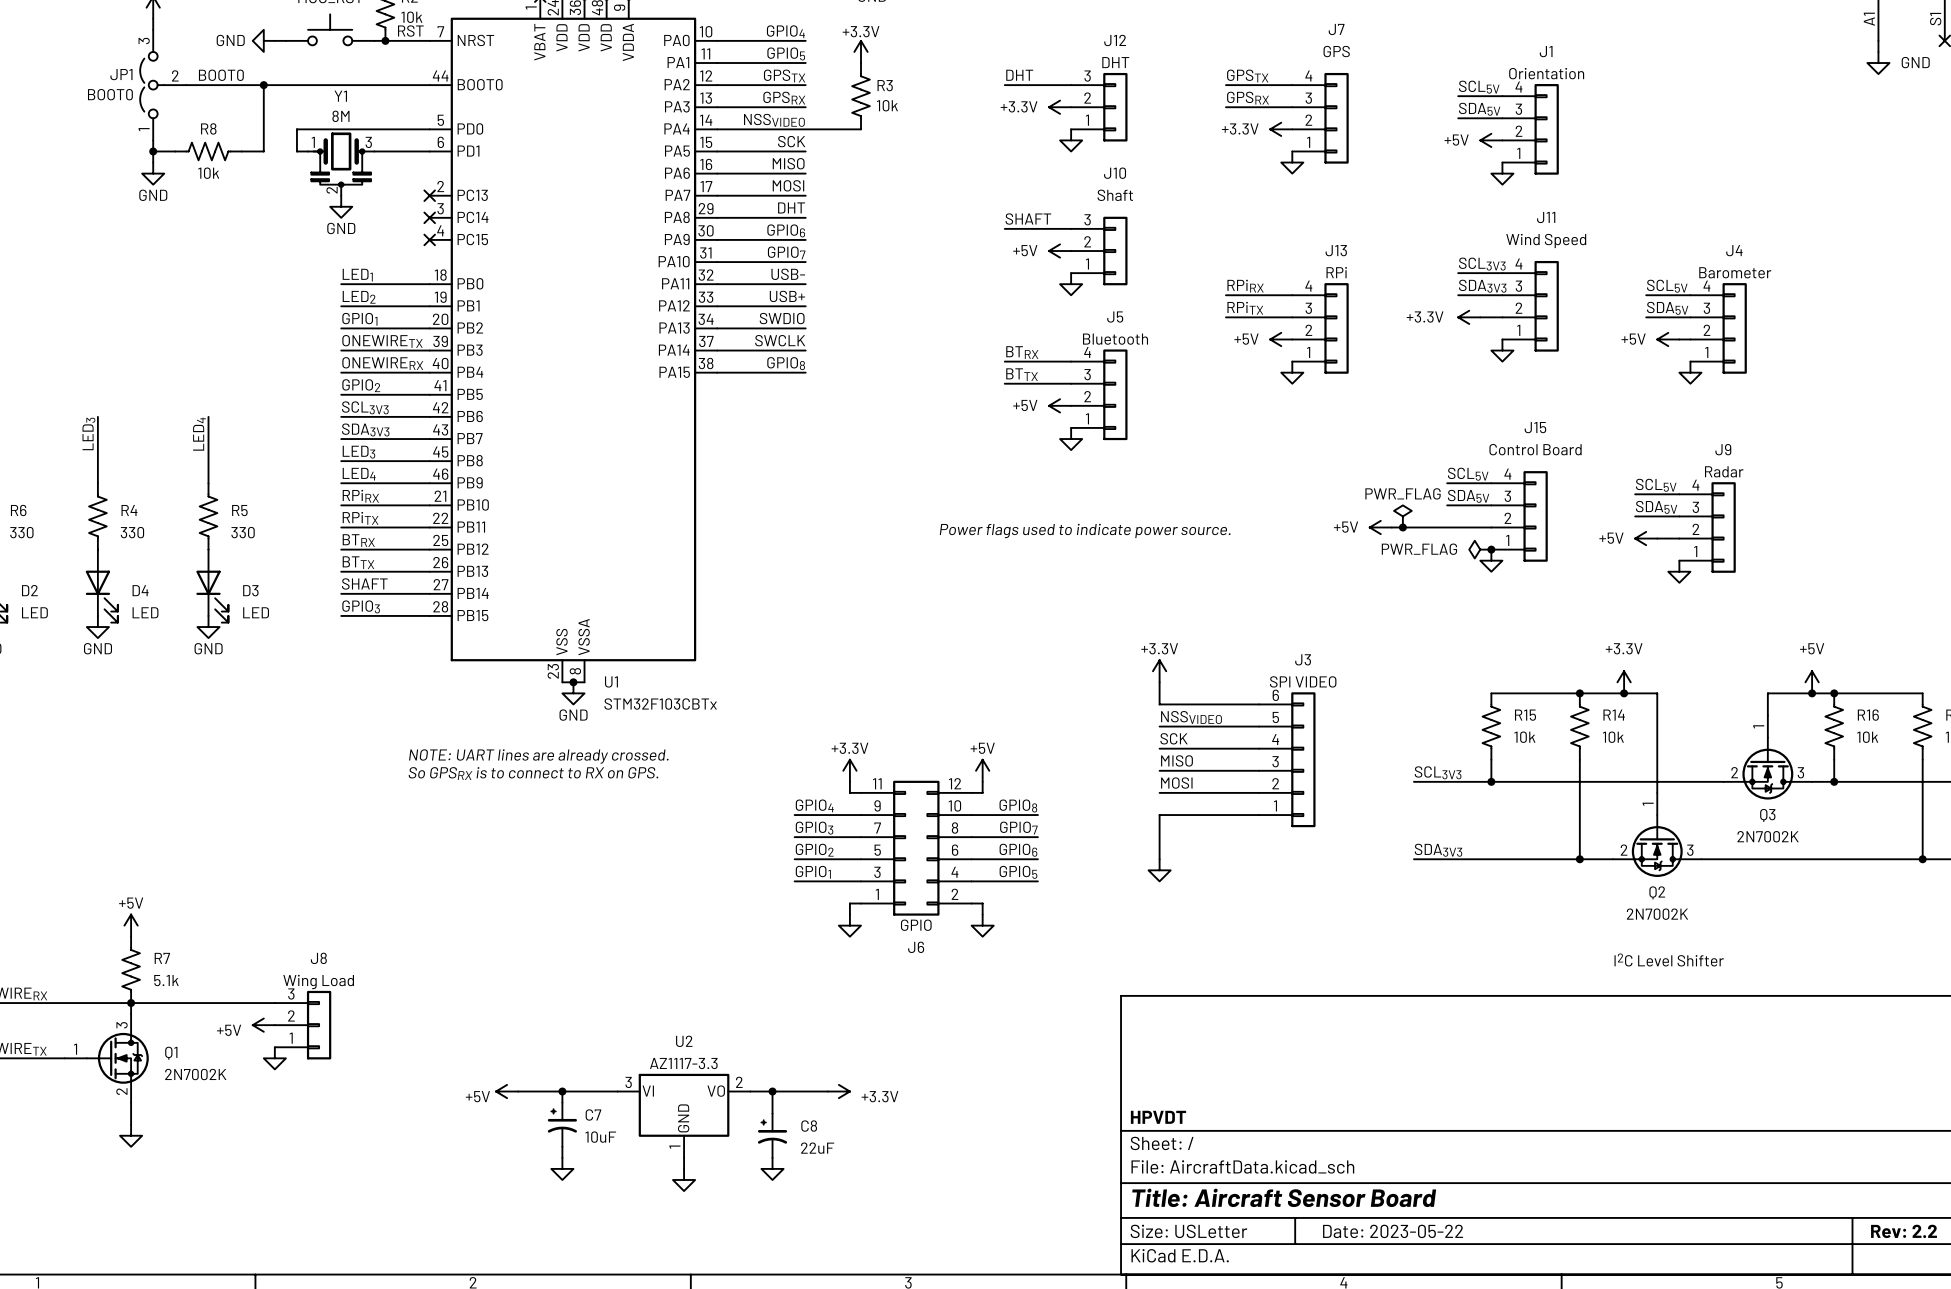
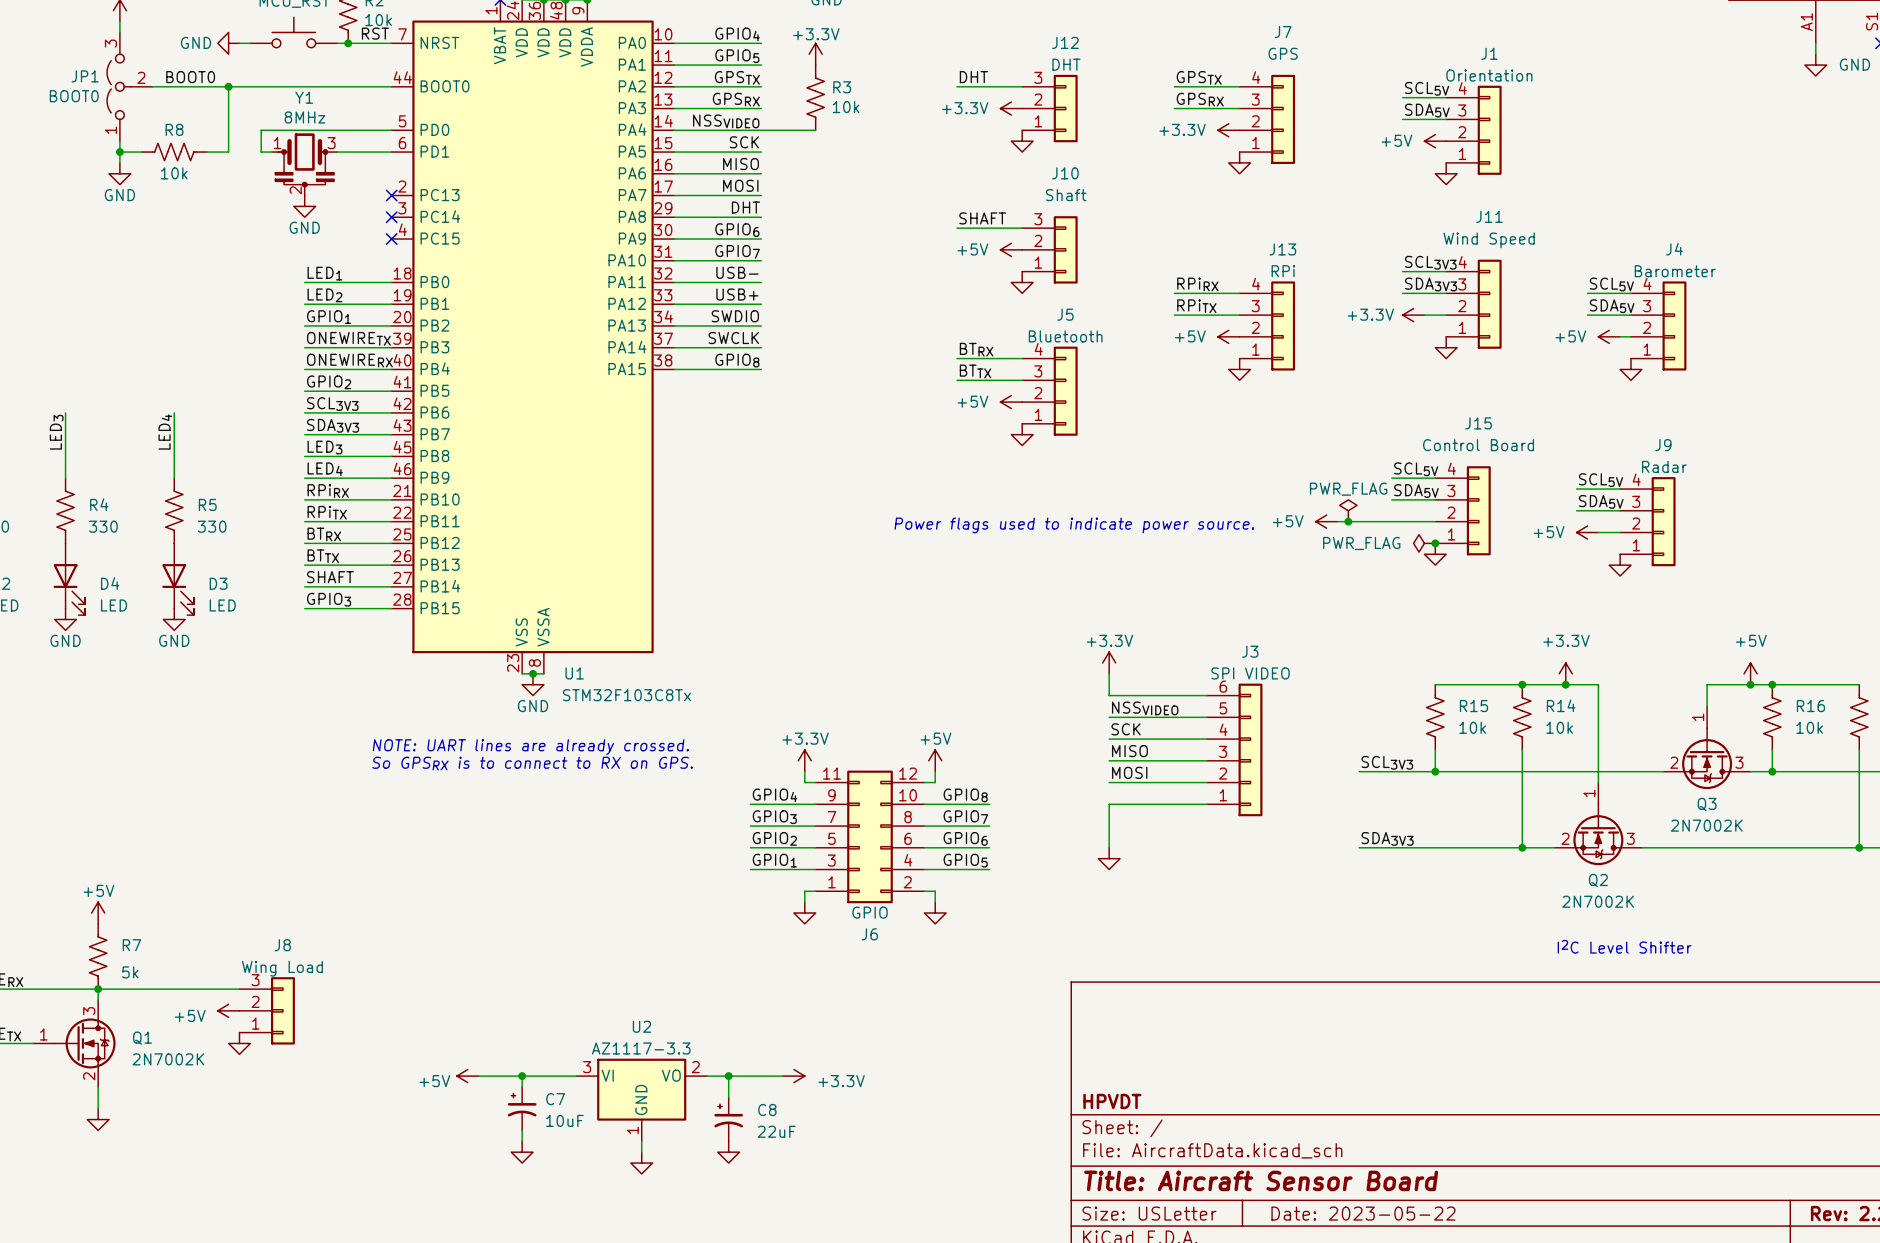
Y1 value: 8M (340, 116) -> 8MHz (304, 117)
U1 value: STM32F103CBTx (660, 704) -> STM32F103C8Tx (626, 695)
R7 value: 5.1k (166, 980) -> 5k (130, 972)

